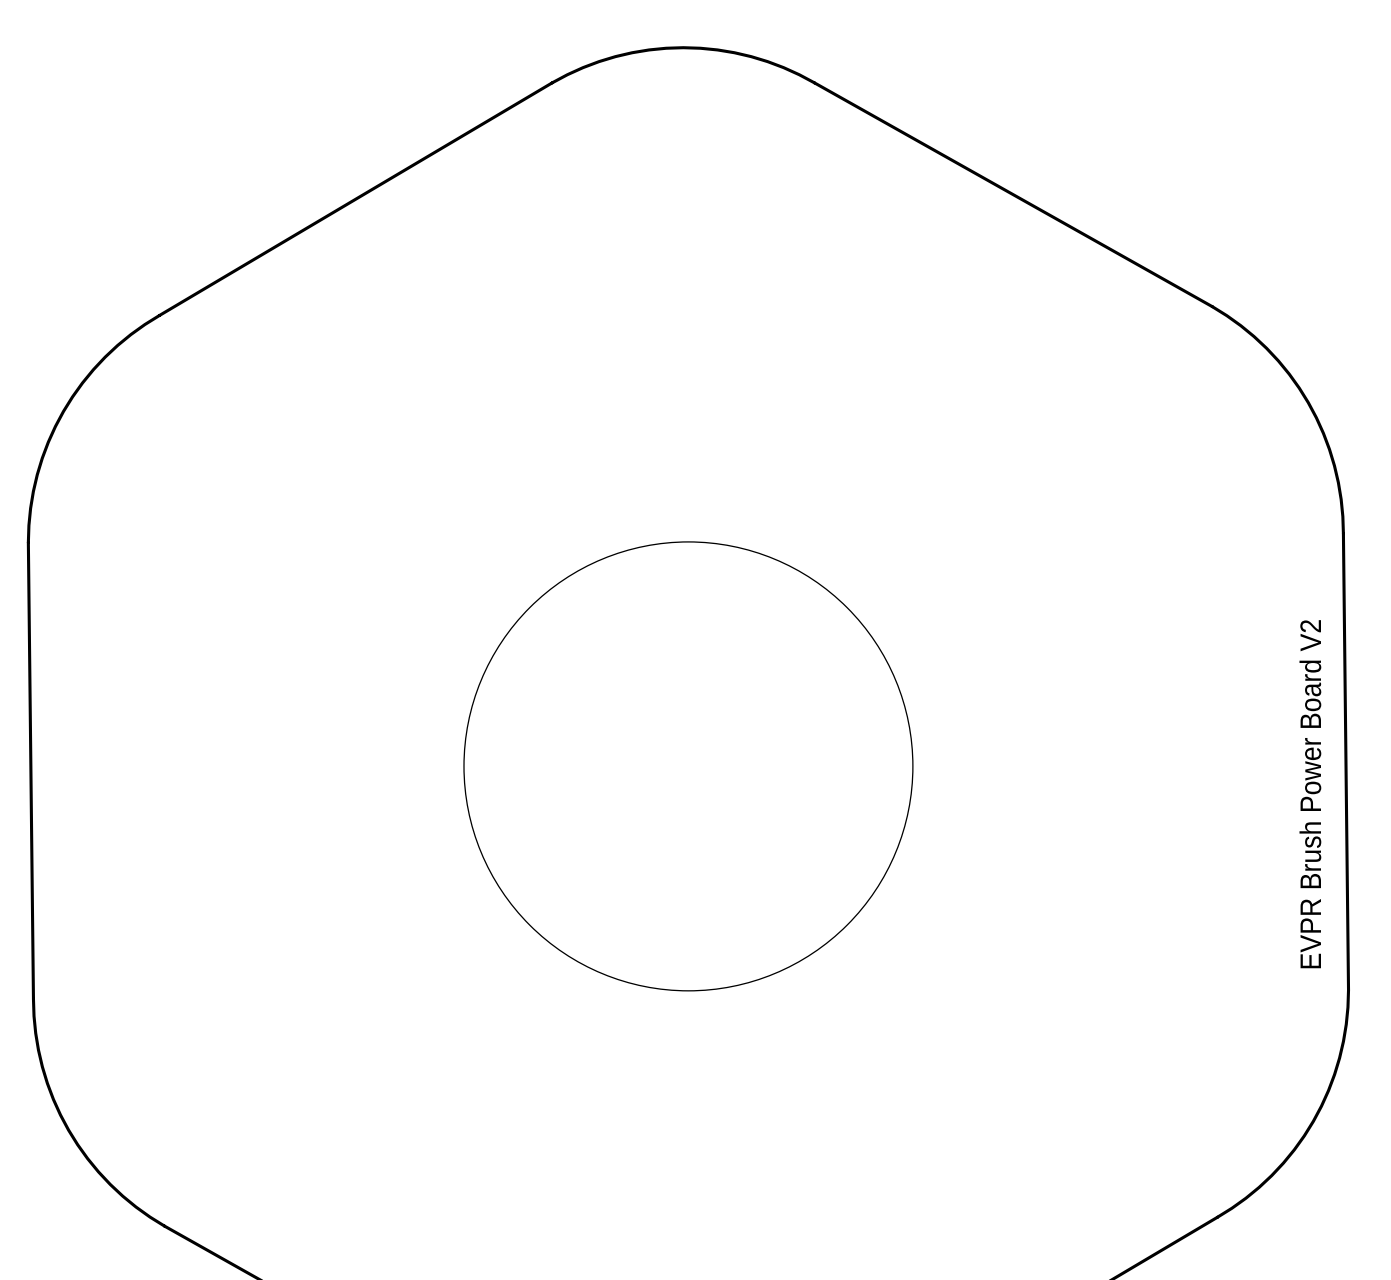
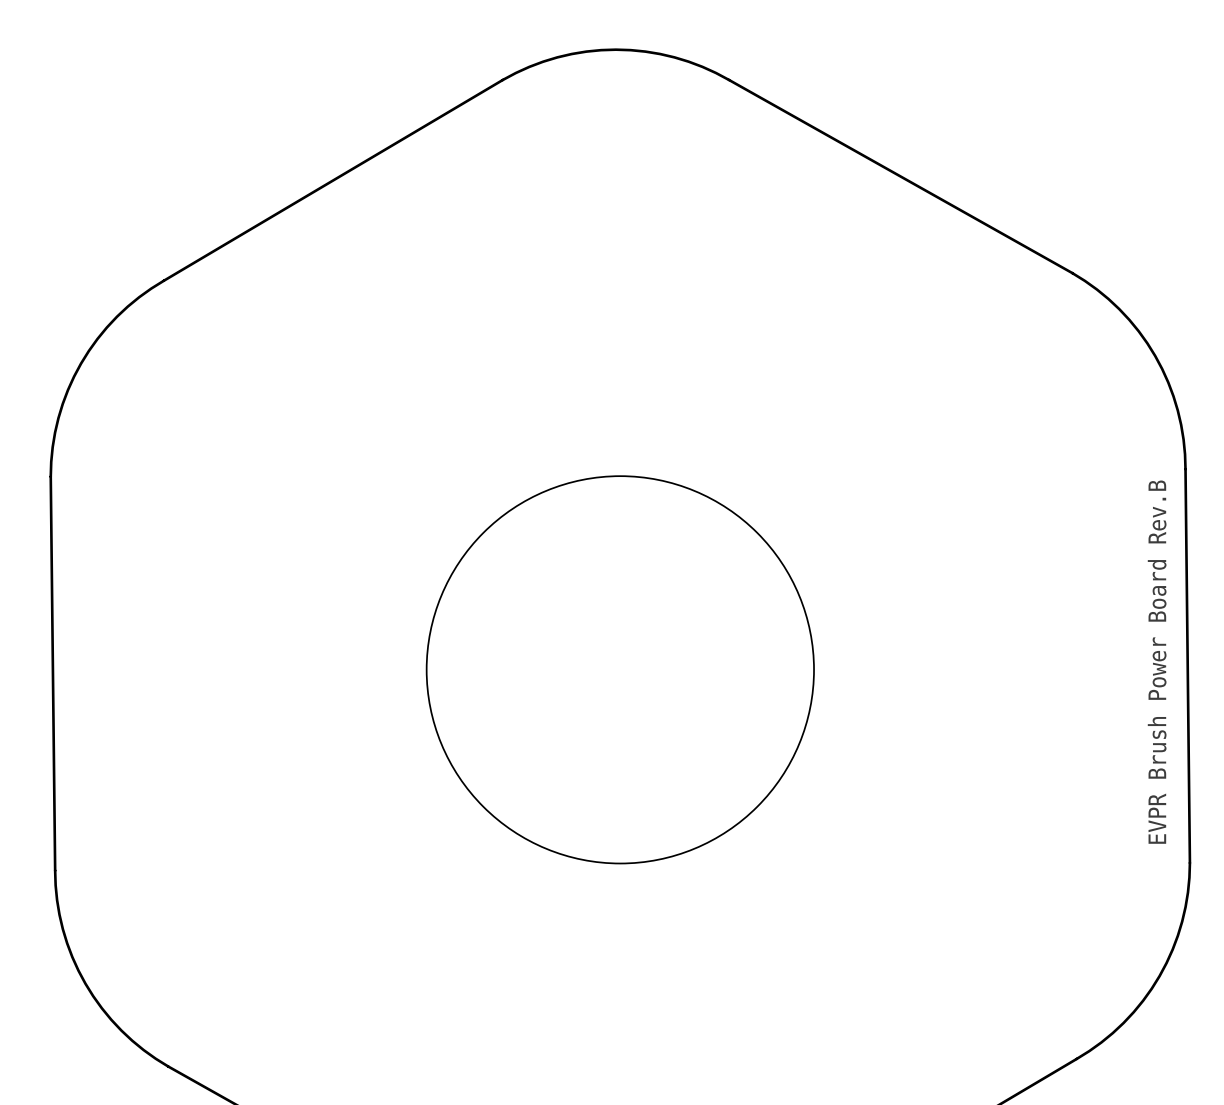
text: EVPR Brush Power Board V2 (1310, 794) -> EVPR Brush Power Board Rev.B (1157, 662)

